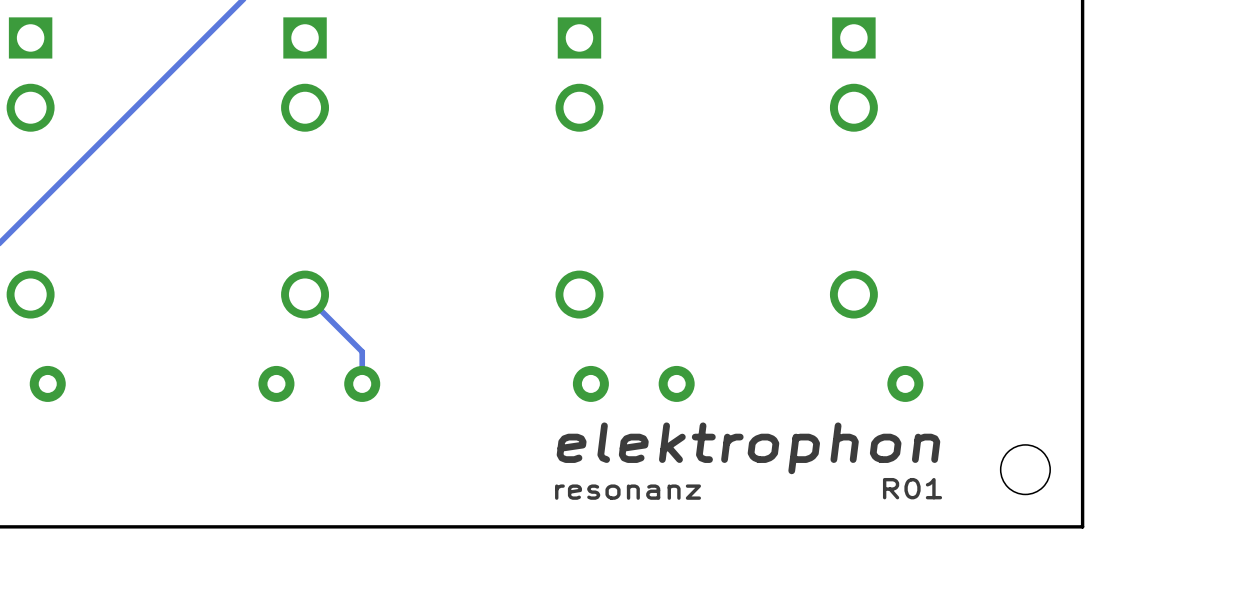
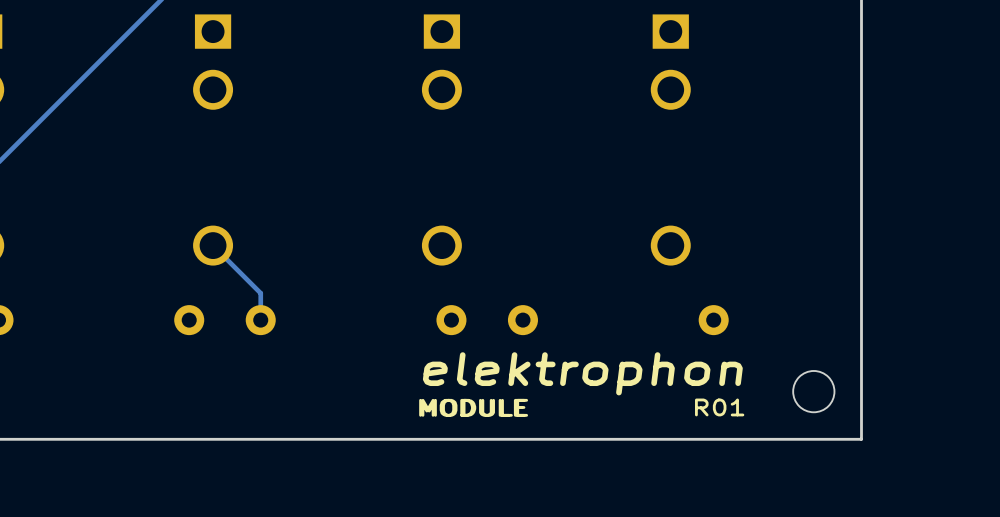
drawing shape: [555, 422, 943, 500] -> [421, 352, 745, 417]
drawing: none -> [419, 398, 526, 417]

